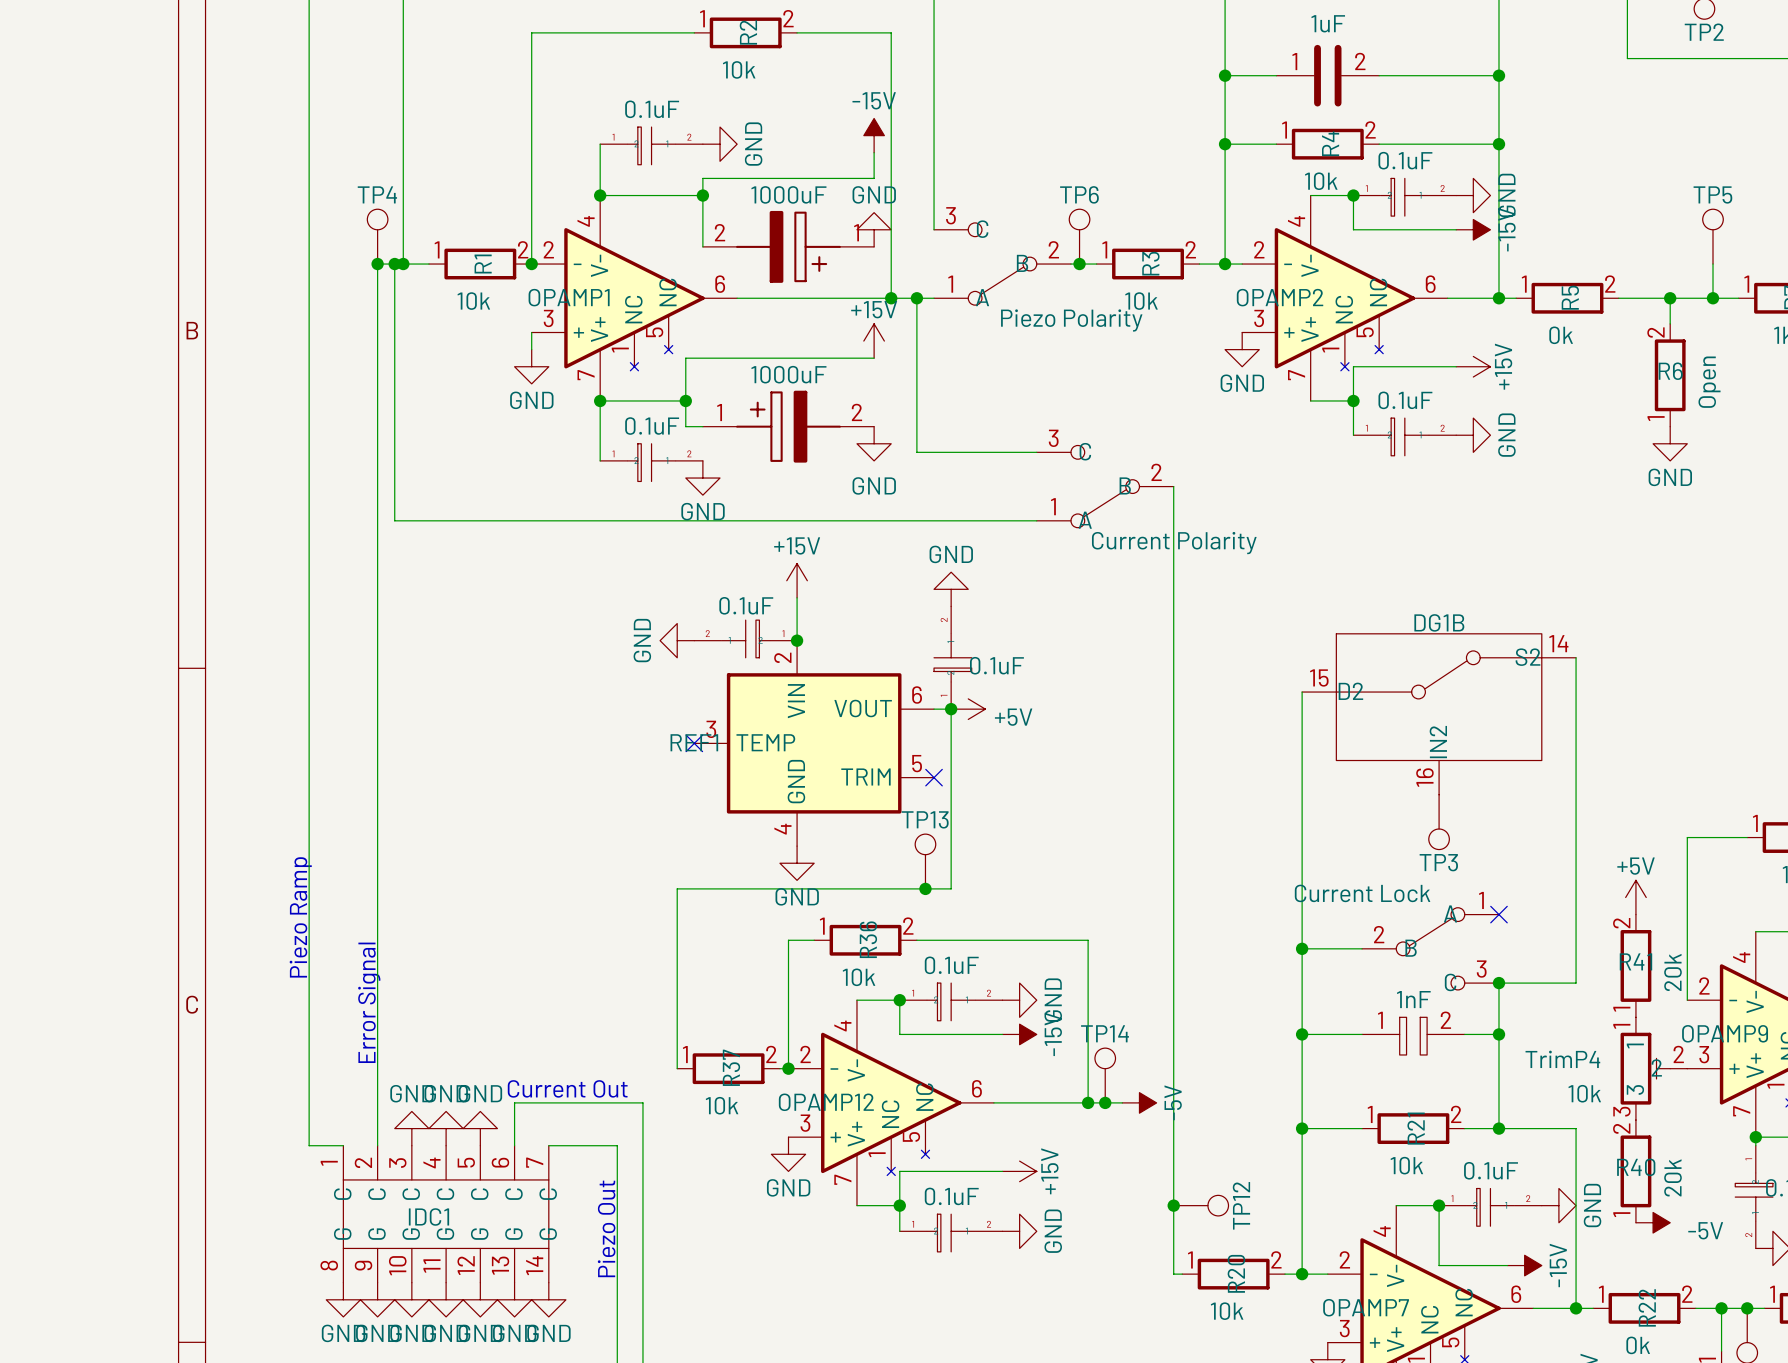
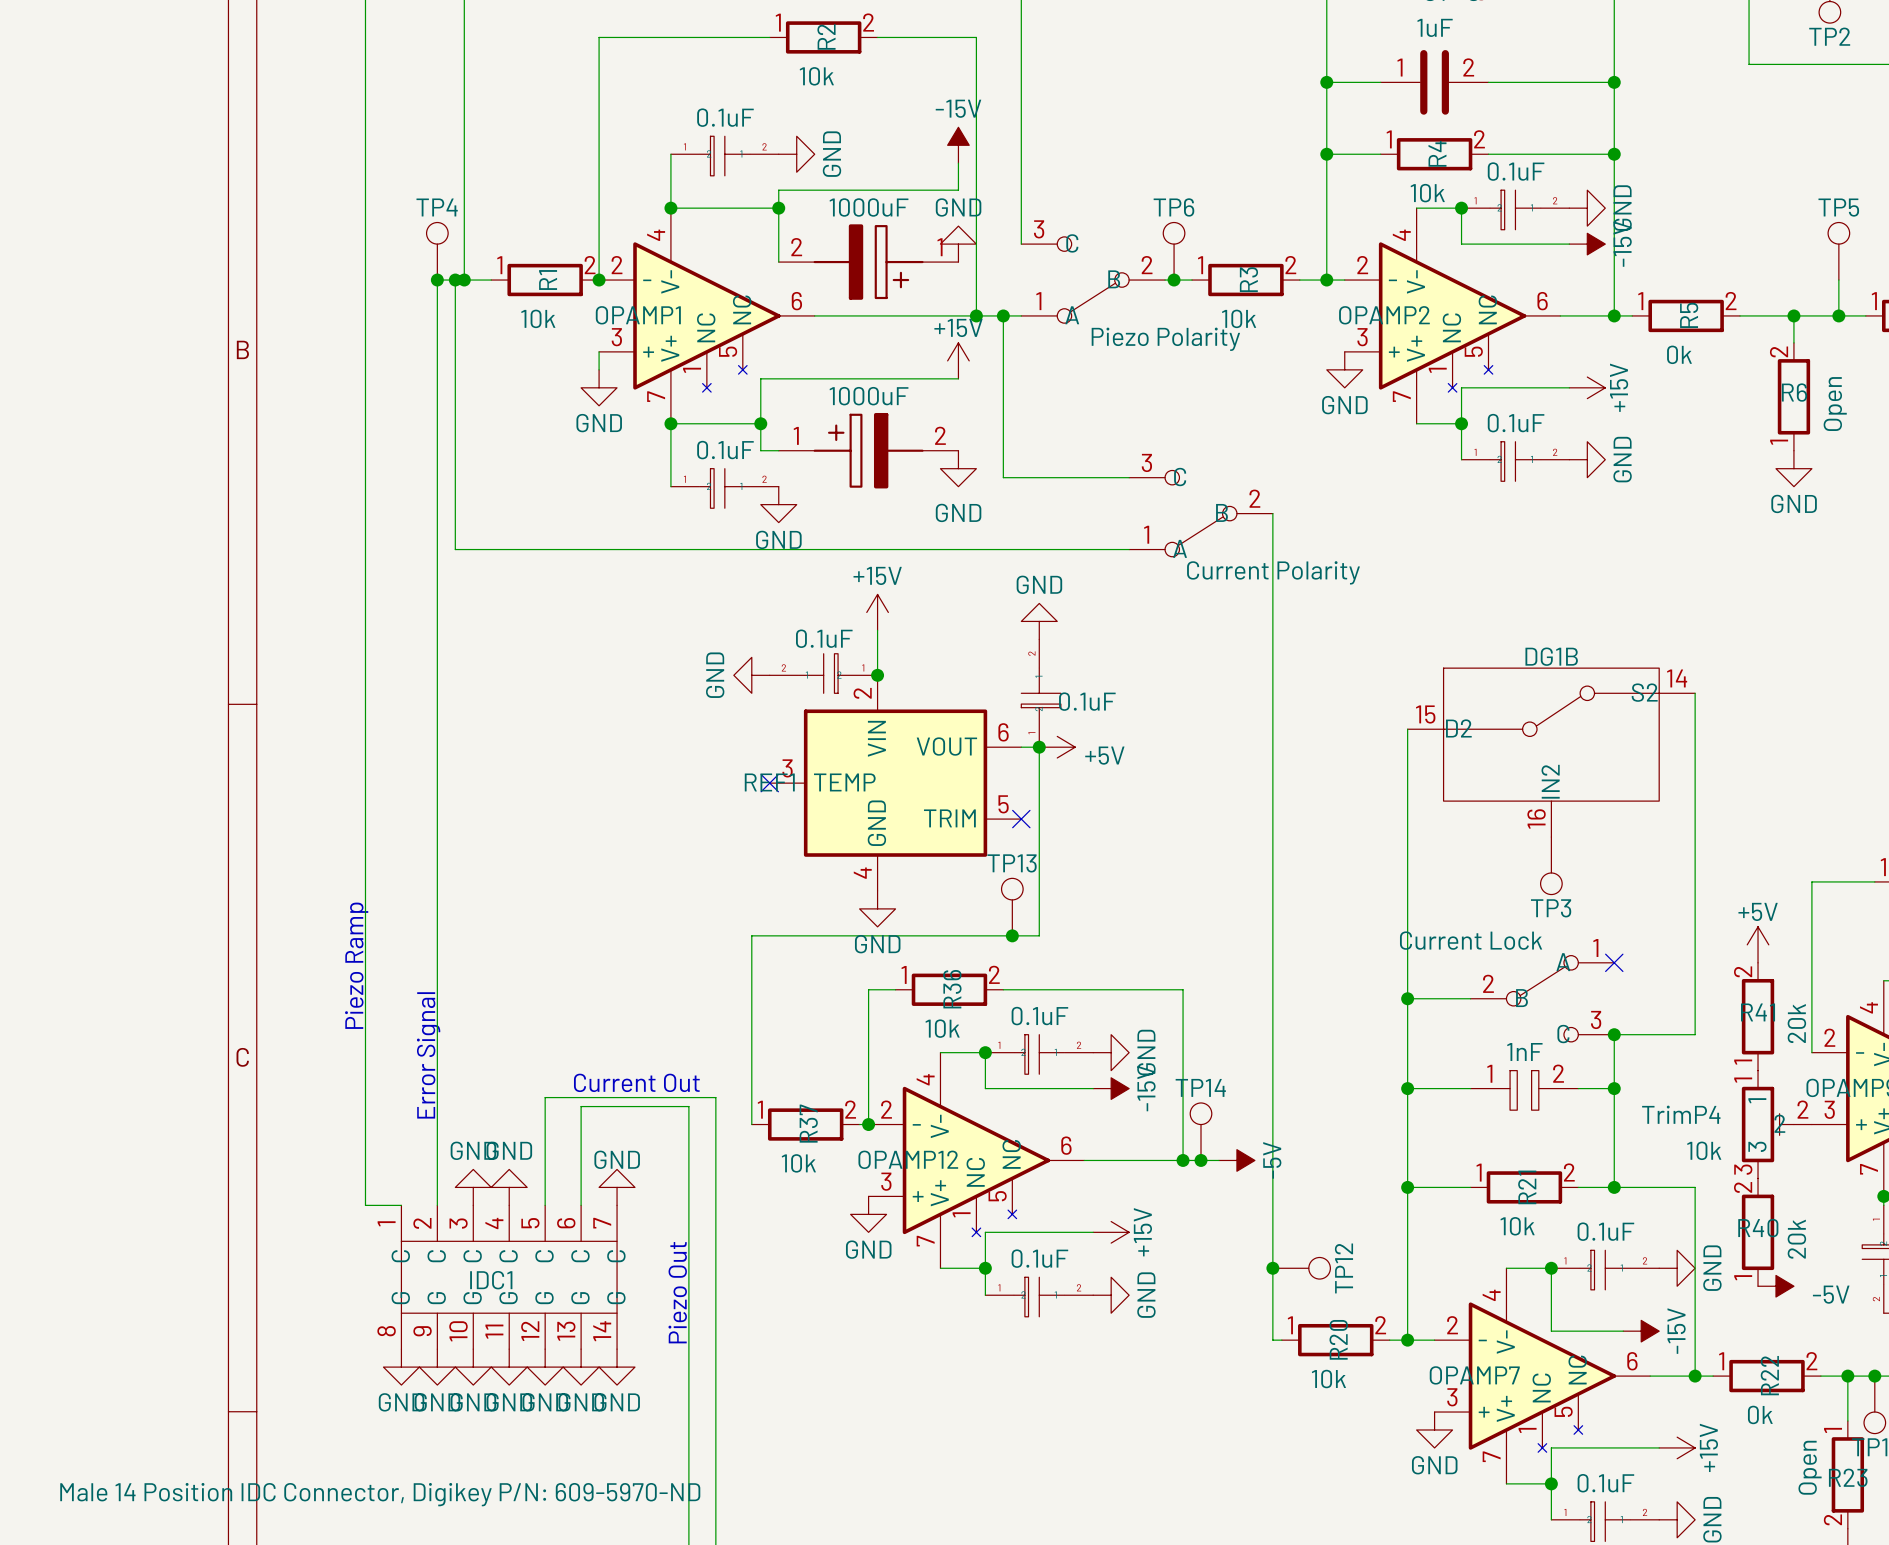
text position: Current Out (567, 1088) -> Current Out (636, 1082)
power symbol text position: GND (480, 1093) -> GND (617, 1159)
wire: (514, 1102) (642, 1102) -> (581, 1160) (581, 1106) (688, 1106) (688, 1205)
wire: none -> (715, 1160) (715, 1097) (545, 1097) (545, 1205)
power symbol position: GND (480, 1128) -> GND (617, 1187)
wire: (548, 1145) (617, 1145) -> none

